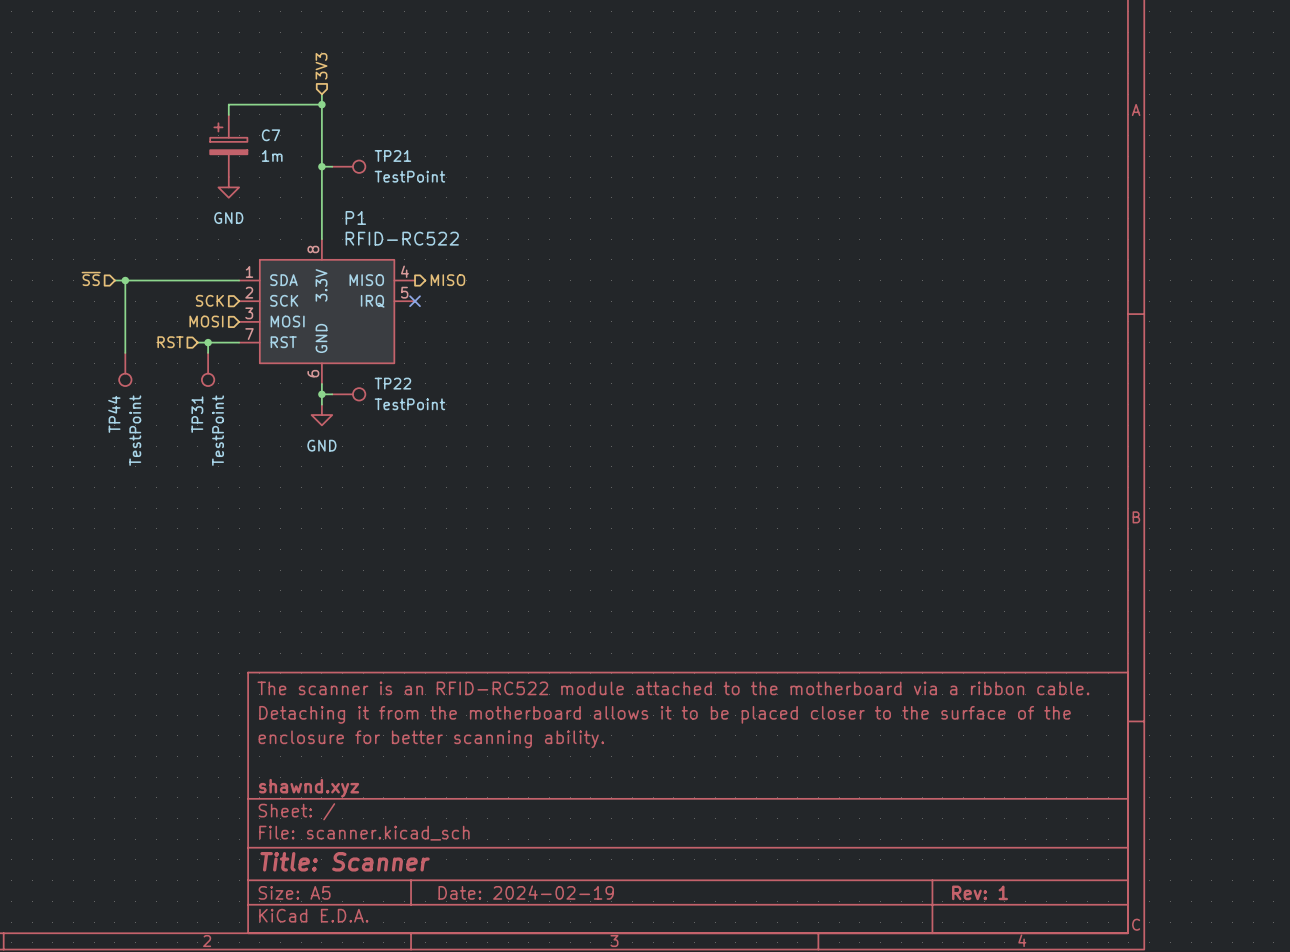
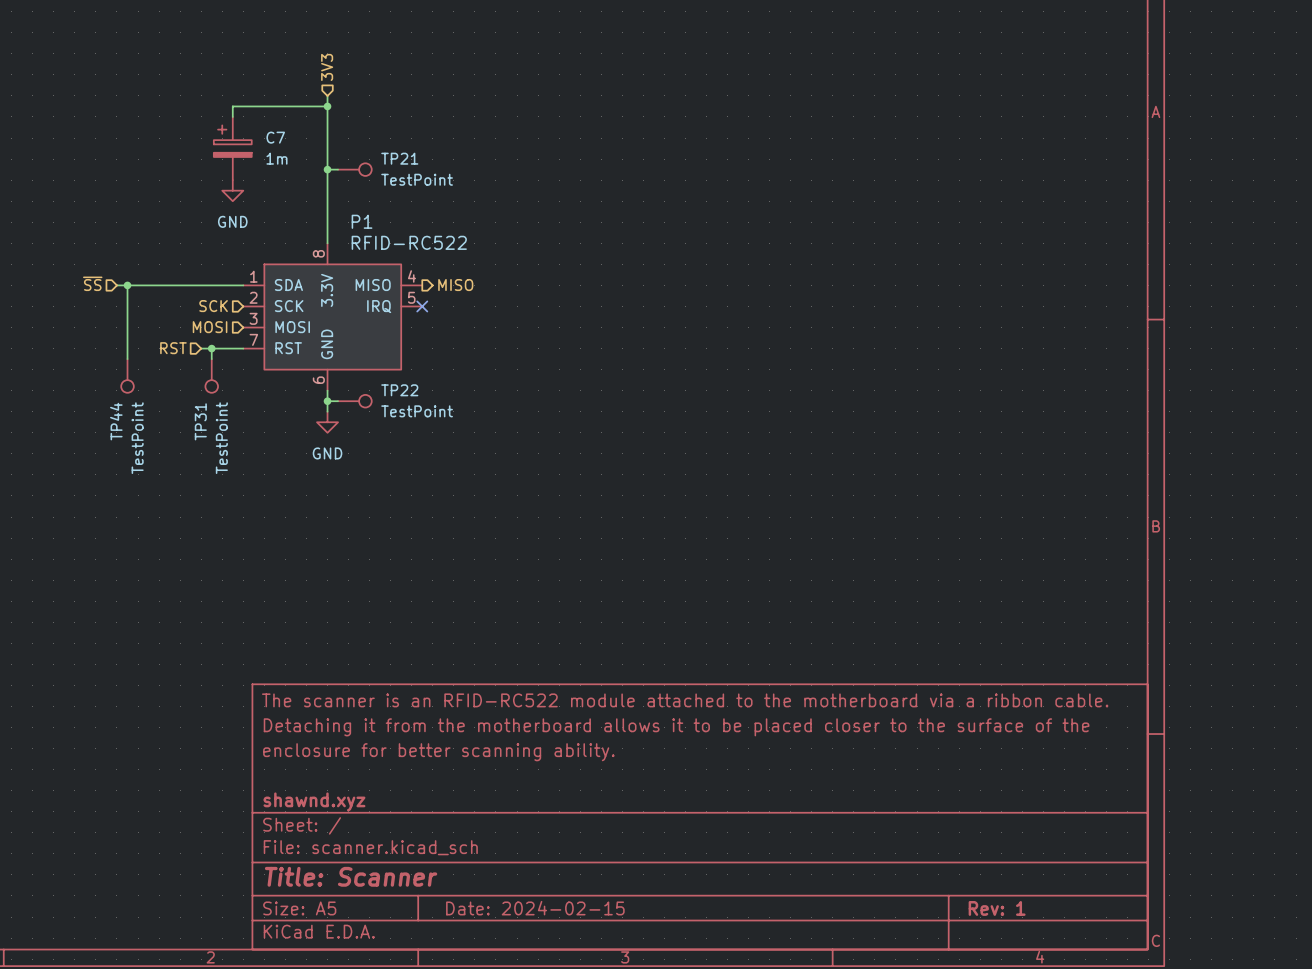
title block: Date: 2024-02-19 (526, 892) -> Date: 2024-02-15 (535, 908)

